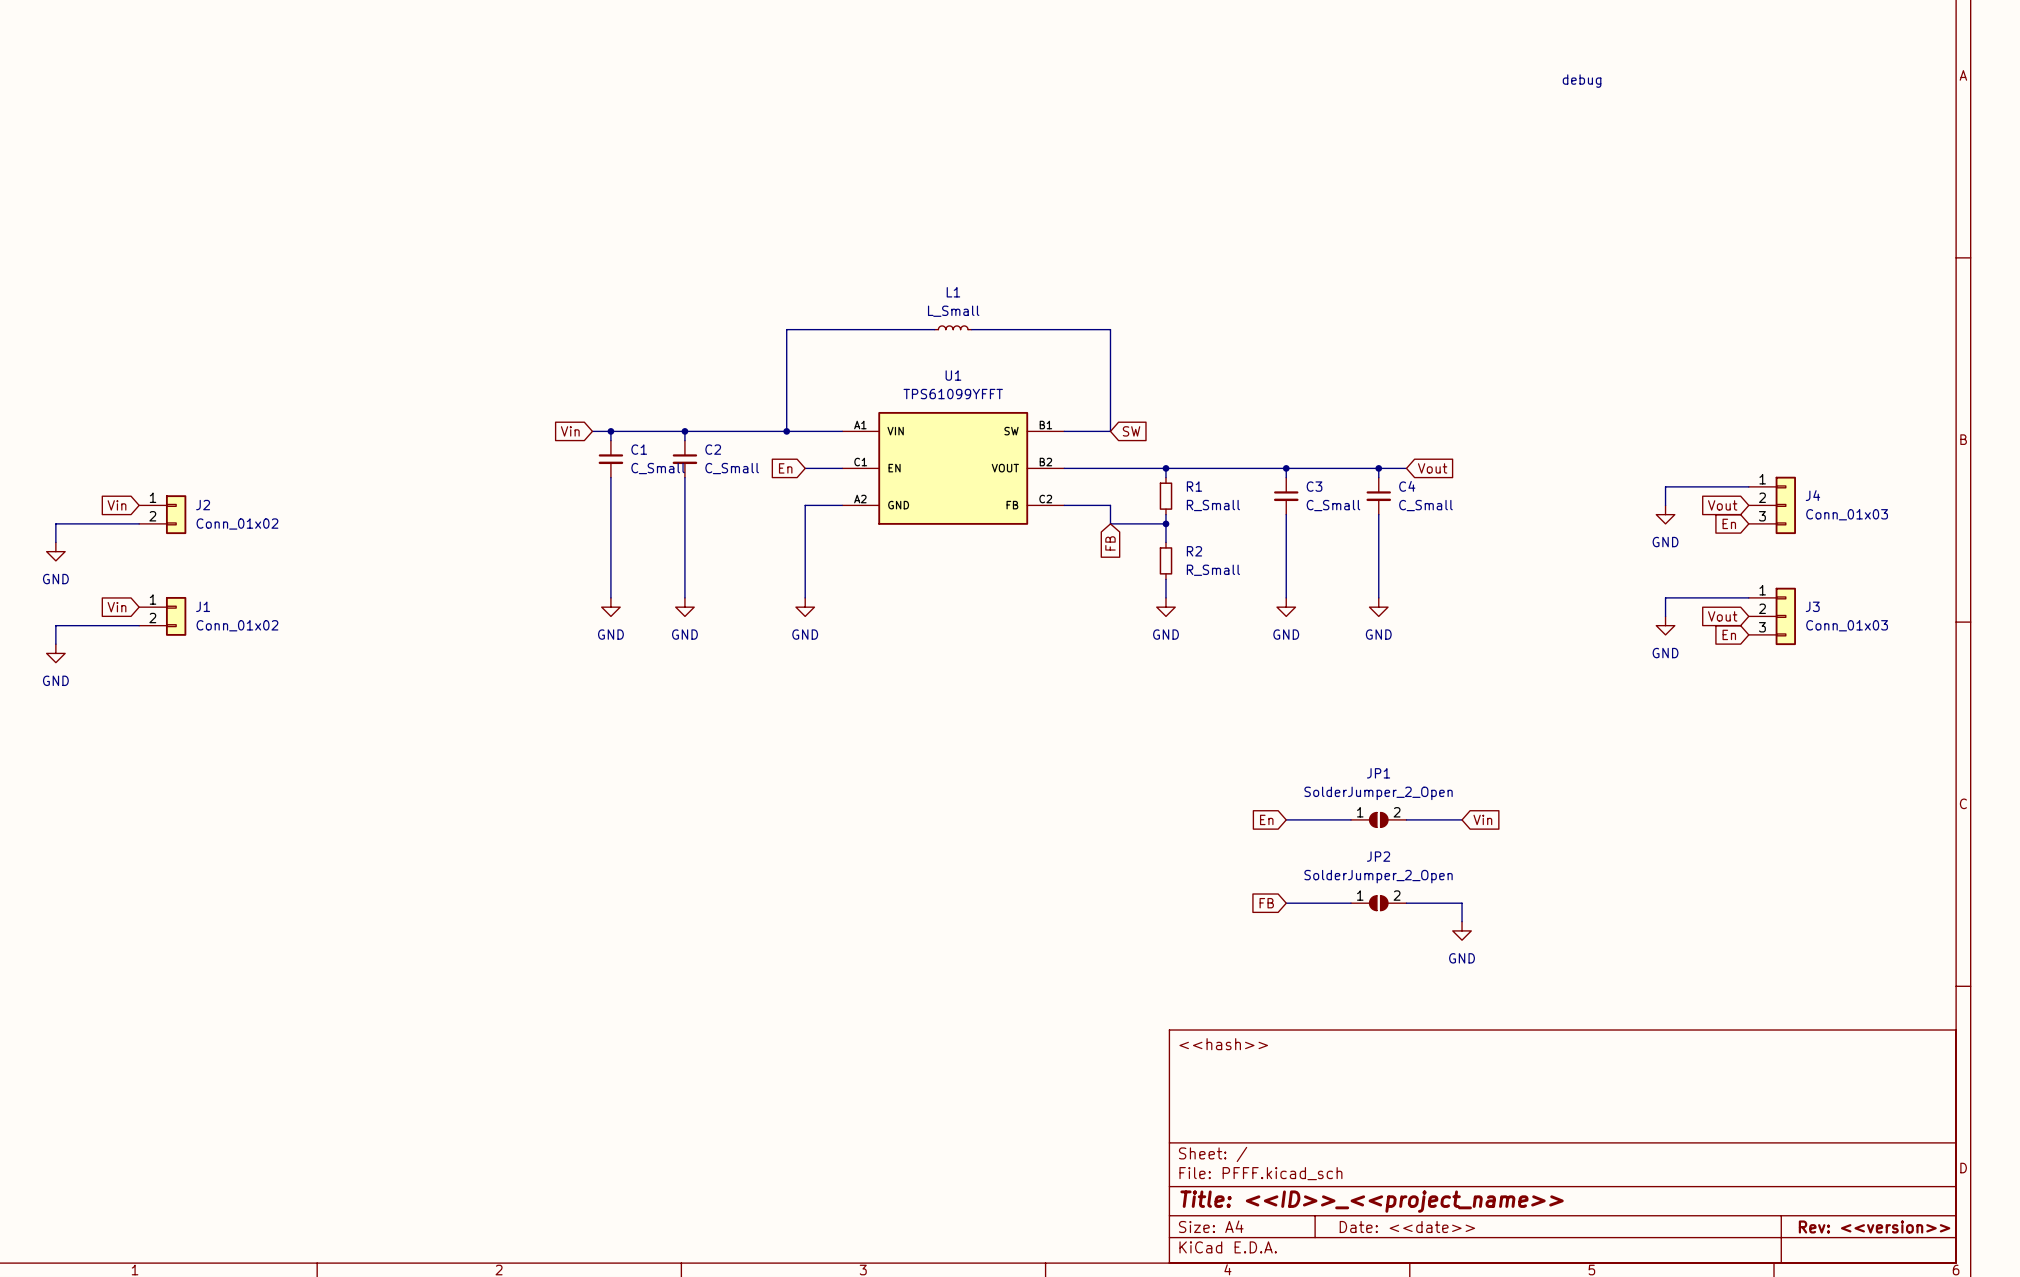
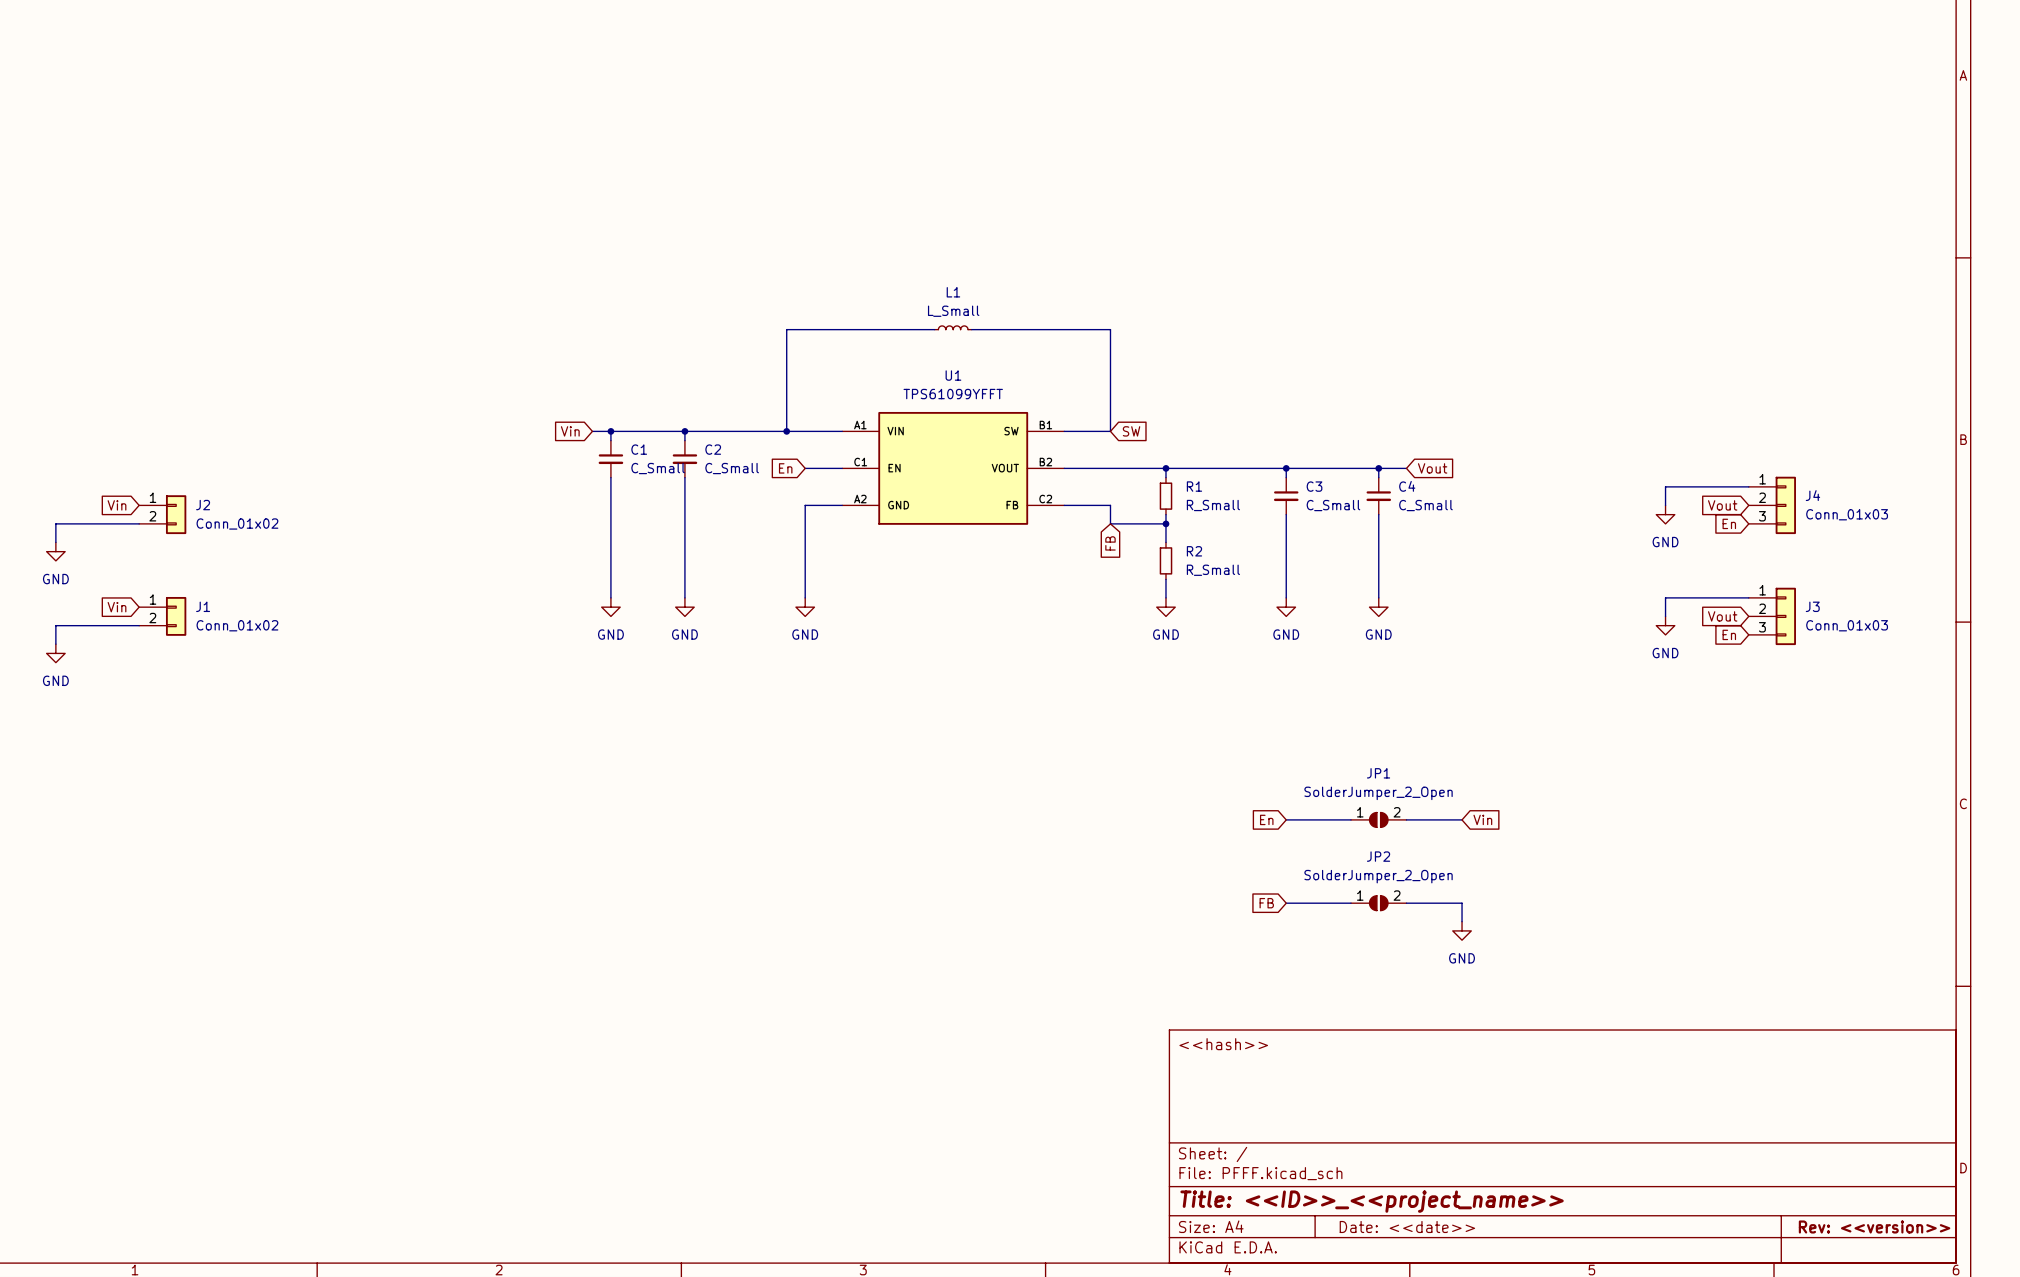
text: debug (1582, 81) -> none

